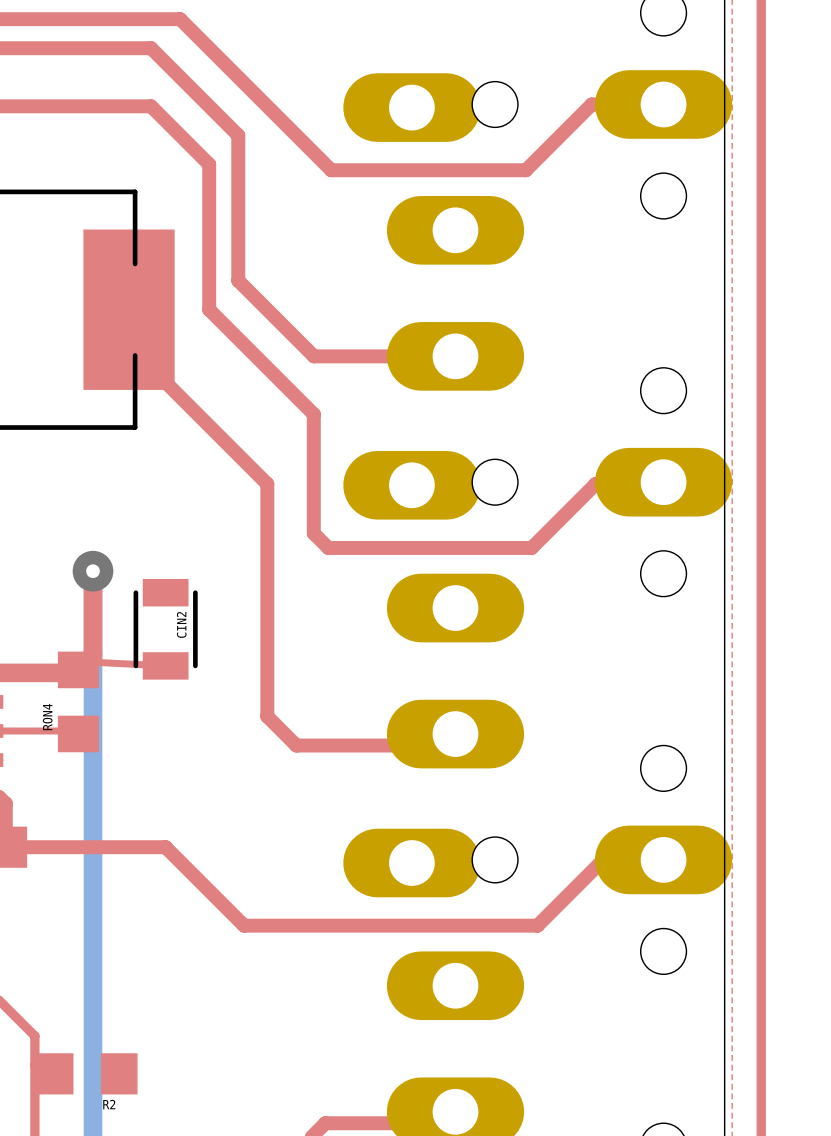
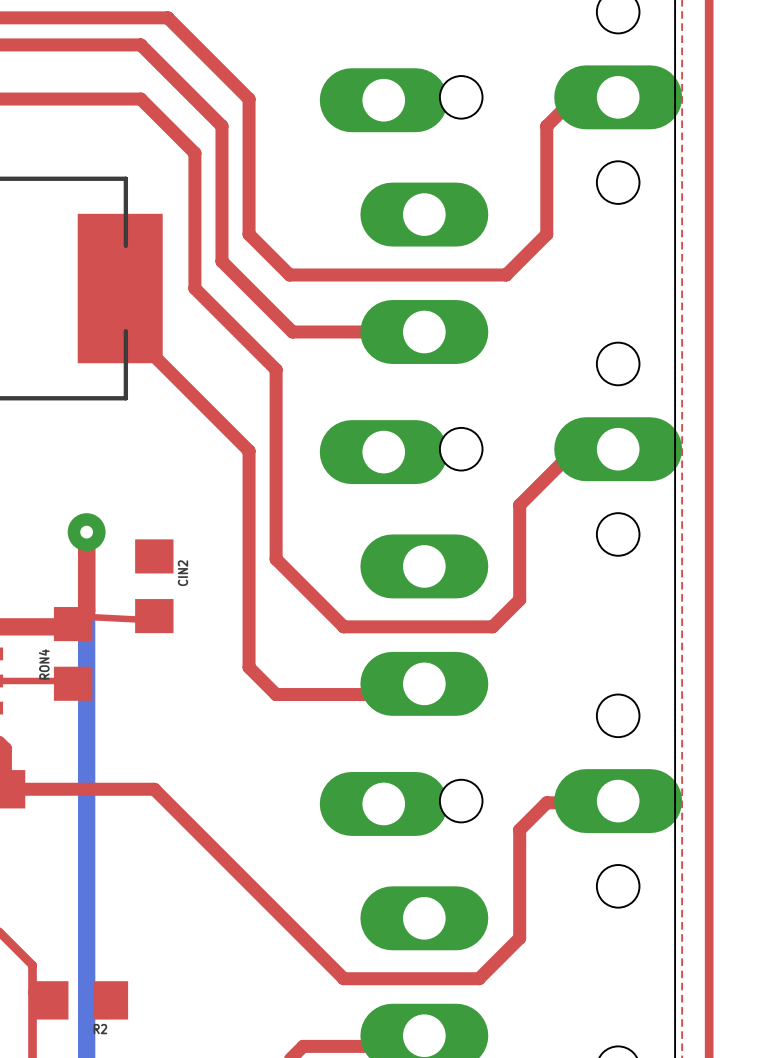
top track: (617, 104) (591, 104) (525, 170) (331, 170) (267, 106) -> (575, 97) (546, 126) (546, 234) (506, 274) (289, 274) (249, 234) (249, 99)
top track: (296, 396) (313, 414) (313, 533) (328, 547) (531, 547) (595, 484) (615, 484) -> (276, 369) (276, 559) (343, 626) (492, 626) (519, 599) (519, 505) (573, 450)
CIN2 footprint: [133, 578, 198, 680] -> [135, 539, 174, 634]
top track: (663, 859) (603, 859) (537, 925) (244, 925) -> (616, 802) (546, 802) (519, 829) (519, 938) (479, 978) (343, 978) (227, 862)

